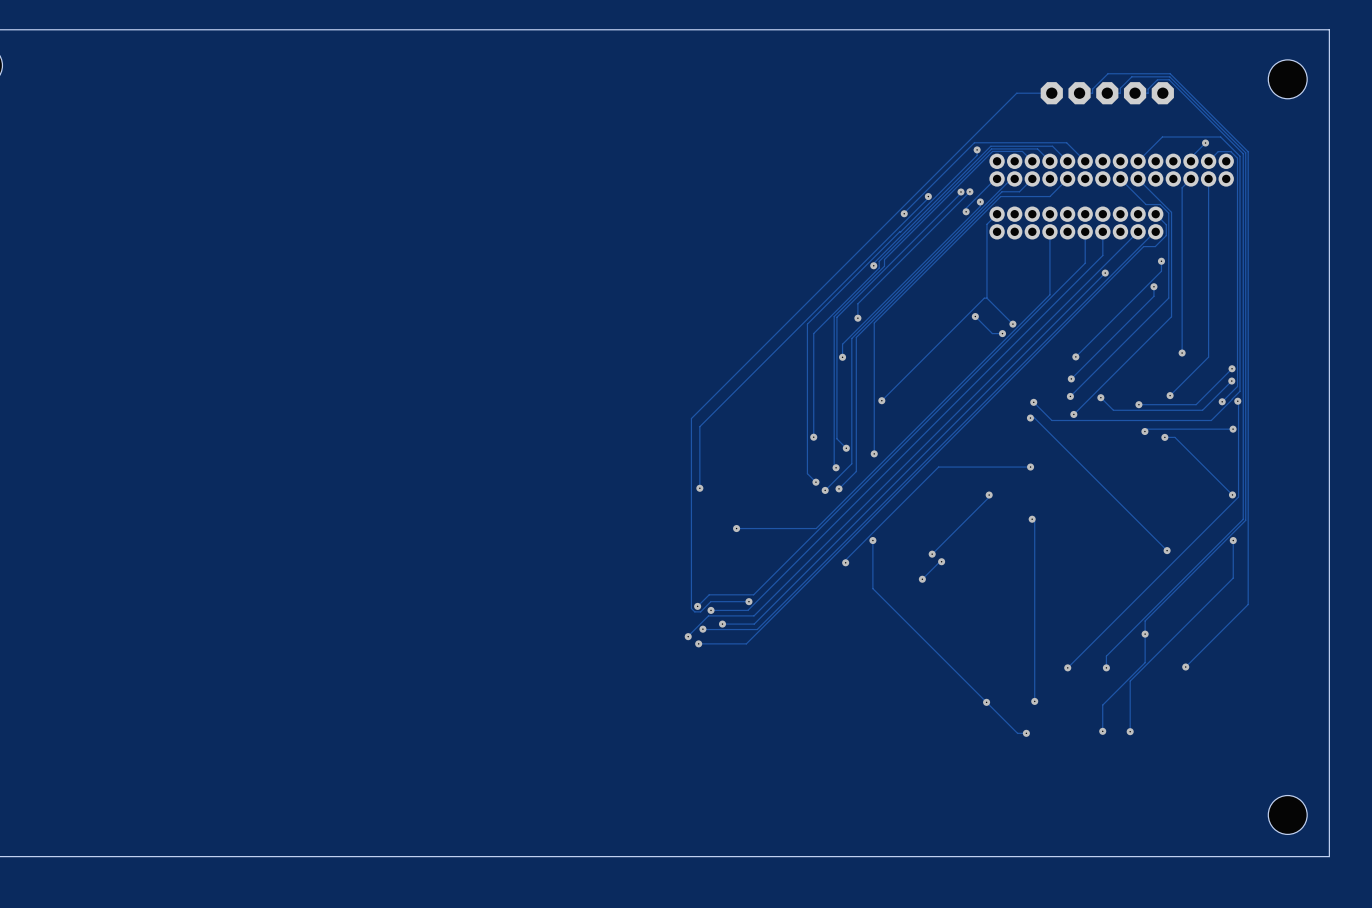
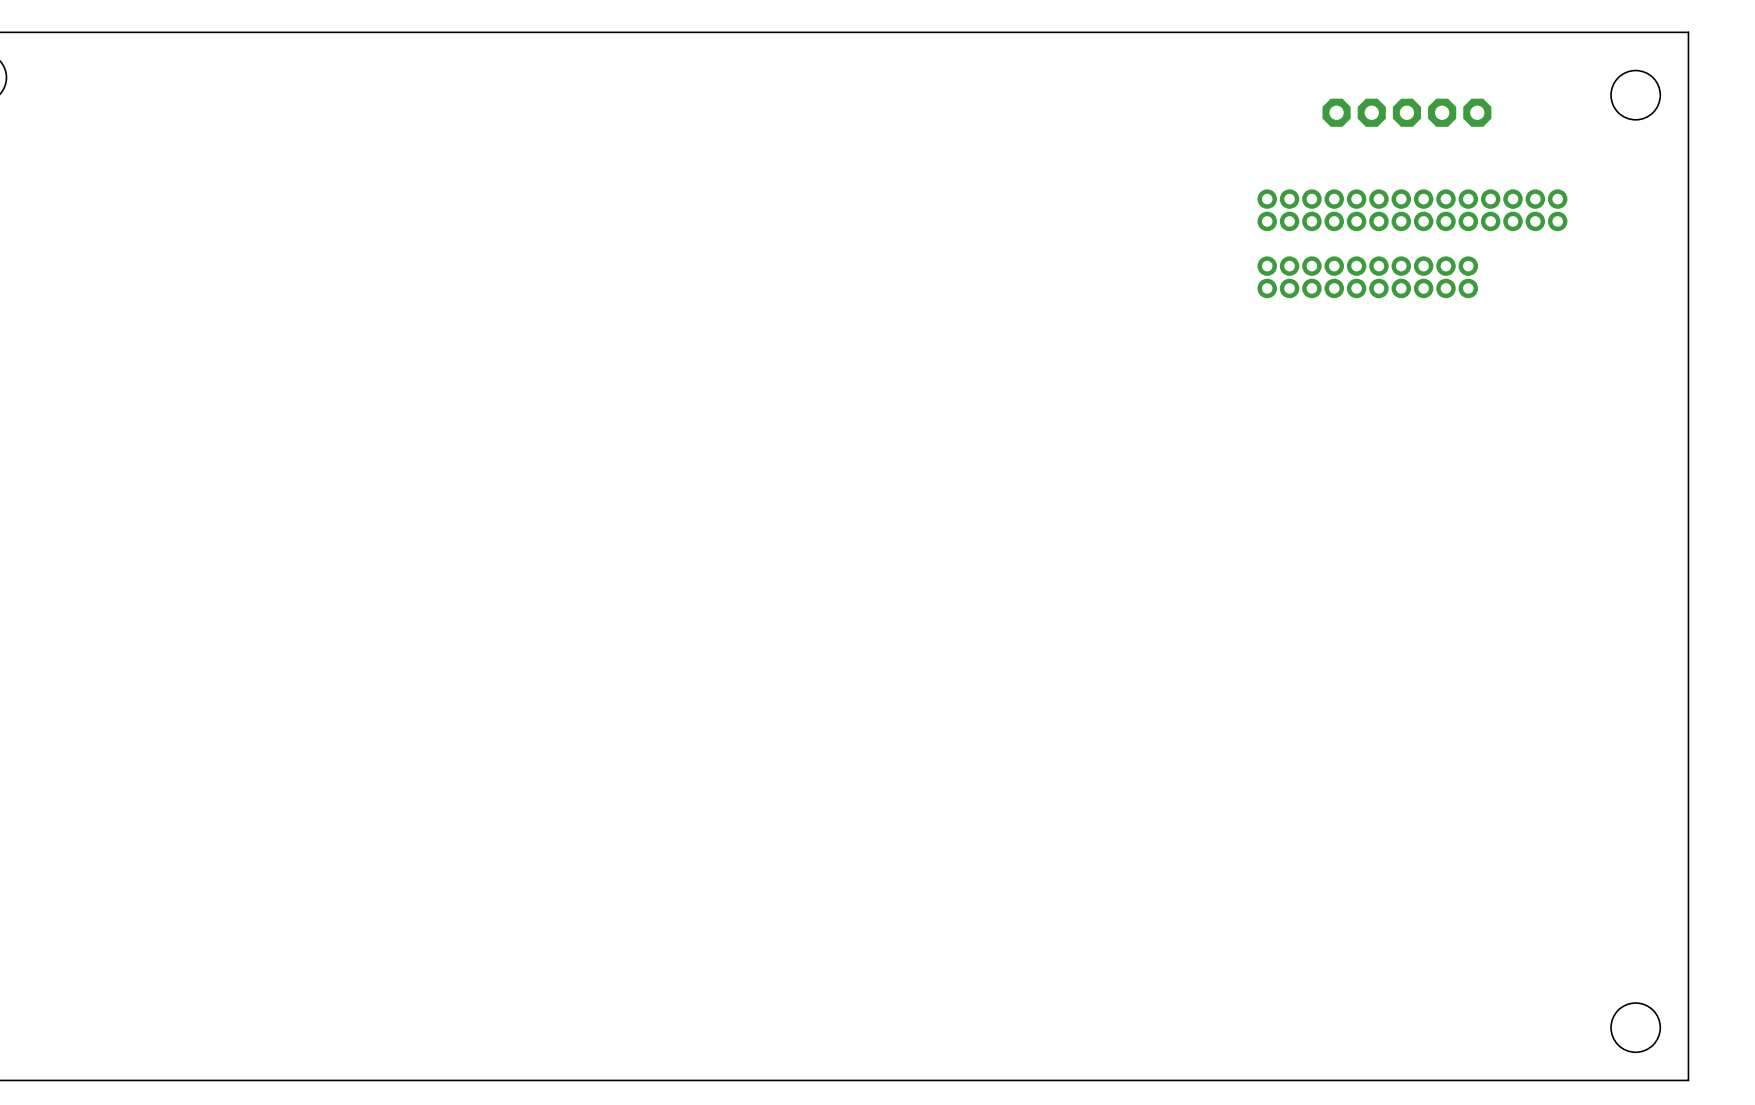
track: (1051, 93) (1016, 93) (691, 418) (691, 608) (694, 611) (700, 611) (710, 601) (748, 601) -> none
track: (1079, 93) (1092, 93) (1092, 89) (1107, 73) (1170, 73) (1248, 151) (1248, 604) (1185, 667) -> none
track: (1107, 93) (1120, 93) (1120, 88) (1131, 76) (1169, 76) (1245, 152) (1245, 520) (1145, 620) (1145, 662) (1102, 705) (1102, 731) -> none
track: (1135, 93) (1148, 93) (1148, 89) (1157, 79) (1169, 79) (1243, 153) (1243, 519) (1106, 656) (1106, 667) -> none
track: (1205, 143) (1190, 157) (1190, 161) -> none
via: (1205, 143) -> none
track: (977, 149) (977, 155) (807, 324) (807, 473) (815, 482) -> none
via: (977, 149) -> none
track: (1032, 161) (1022, 151) (992, 151) (884, 259) (884, 266) (834, 316) (834, 465) (836, 467) -> none
track: (1049, 161) (1037, 148) (991, 148) (879, 261) (879, 268) (813, 333) (813, 437) -> none
track: (1067, 161) (1052, 146) (990, 146) (873, 263) (873, 265) -> none
track: (1085, 161) (1066, 142) (974, 142) (904, 213) -> none
track: (1138, 161) (1162, 136) (1220, 136) (1239, 156) (1239, 391) (1211, 420) (1051, 420) (1033, 402) -> none
track: (1208, 161) (1218, 151) (1230, 151) (1237, 158) (1237, 386) (1222, 401) -> none
track: (997, 178) (966, 208) (966, 211) -> none
track: (1014, 178) (1011, 178) (851, 338) (851, 463) (825, 490) -> none
track: (1032, 178) (1019, 191) (1002, 191) (856, 337) (856, 471) (839, 488) -> none
track: (1067, 178) (1049, 196) (1000, 196) (874, 323) (874, 453) -> none
track: (1120, 178) (1146, 204) (1160, 204) (1168, 213) (1168, 298) (1070, 396) -> none
track: (1138, 178) (1171, 212) (1171, 316) (1073, 414) -> none
track: (1190, 178) (1182, 187) (1182, 353) -> none
track: (1208, 178) (1208, 357) (1170, 395) -> none
track: (961, 191) (836, 317) (836, 438) (846, 448) -> none
via: (961, 191) -> none
track: (969, 191) (857, 303) (857, 318) -> none
via: (969, 191) -> none
track: (928, 196) (699, 426) (699, 488) -> none
via: (928, 196) -> none
track: (980, 201) (980, 206) (842, 344) (842, 357) -> none
via: (980, 201) -> none
via: (966, 211) -> none
via: (904, 213) -> none
track: (997, 214) (986, 224) (986, 298) -> none
track: (1155, 214) (1166, 224) (1166, 235) (1155, 246) (1143, 246) (746, 643) (698, 643) -> none
track: (1049, 231) (1049, 294) (816, 528) (736, 528) -> none
track: (1085, 231) (1085, 263) (753, 594) (709, 594) (697, 606) -> none
track: (1102, 231) (1102, 255) (747, 610) (711, 610) -> none
track: (1138, 231) (754, 615) (708, 615) (688, 636) -> none
track: (1155, 231) (757, 629) (702, 629) -> none
track: (1161, 261) (1161, 271) (1075, 356) -> none
via: (1161, 261) -> none
via: (873, 265) -> none
track: (1105, 273) (754, 624) (722, 624) -> none
via: (1105, 273) -> none
track: (1153, 286) (1153, 296) (1071, 378) -> none
via: (1153, 286) -> none
track: (986, 298) (1012, 324) -> none
track: (986, 298) (984, 298) (881, 400) -> none
track: (975, 316) (992, 333) (1002, 333) -> none
via: (975, 316) -> none
via: (857, 318) -> none
via: (1012, 324) -> none
via: (1002, 333) -> none
via: (1182, 353) -> none
via: (1075, 356) -> none
via: (842, 357) -> none
track: (1232, 368) (1196, 404) (1138, 404) -> none
via: (1232, 368) -> none
via: (1071, 378) -> none
track: (1231, 381) (1202, 410) (1113, 410) (1100, 397) -> none
via: (1231, 381) -> none
via: (1170, 395) -> none
via: (1070, 396) -> none
via: (1100, 397) -> none
via: (881, 400) -> none
via: (1222, 401) -> none
track: (1237, 401) (1238, 497) (1067, 667) -> none
via: (1237, 401) -> none
via: (1033, 402) -> none
via: (1138, 404) -> none
via: (1073, 414) -> none
track: (1030, 418) (1034, 418) (1167, 550) -> none
via: (1030, 418) -> none
track: (1233, 429) (1147, 429) (1144, 431) -> none
via: (1233, 429) -> none
via: (1144, 431) -> none
via: (813, 437) -> none
track: (1164, 437) (1174, 437) (1232, 494) -> none
via: (1164, 437) -> none
via: (846, 448) -> none
via: (874, 453) -> none
via: (836, 467) -> none
track: (1030, 467) (938, 467) (845, 560) (845, 562) -> none
via: (1030, 467) -> none
via: (815, 482) -> none
via: (699, 488) -> none
via: (839, 488) -> none
via: (825, 490) -> none
via: (1232, 494) -> none
track: (989, 495) (932, 554) -> none
via: (989, 495) -> none
track: (1032, 519) (1034, 521) (1034, 701) -> none
via: (1032, 519) -> none
via: (736, 528) -> none
track: (872, 540) (872, 588) (1017, 733) (1026, 733) -> none
via: (872, 540) -> none
track: (1233, 540) (1233, 578) (1130, 681) (1130, 731) -> none
via: (1233, 540) -> none
via: (1167, 550) -> none
via: (932, 554) -> none
track: (941, 561) (922, 579) -> none
via: (941, 561) -> none
via: (845, 562) -> none
via: (922, 579) -> none
via: (748, 601) -> none
via: (697, 606) -> none
via: (711, 610) -> none
via: (722, 624) -> none
via: (702, 629) -> none
via: (1145, 634) -> none
via: (688, 636) -> none
via: (698, 643) -> none
via: (1067, 667) -> none
via: (1106, 667) -> none
via: (1185, 667) -> none
via: (1034, 701) -> none
via: (986, 702) -> none
via: (1102, 731) -> none
via: (1130, 731) -> none
via: (1026, 733) -> none

